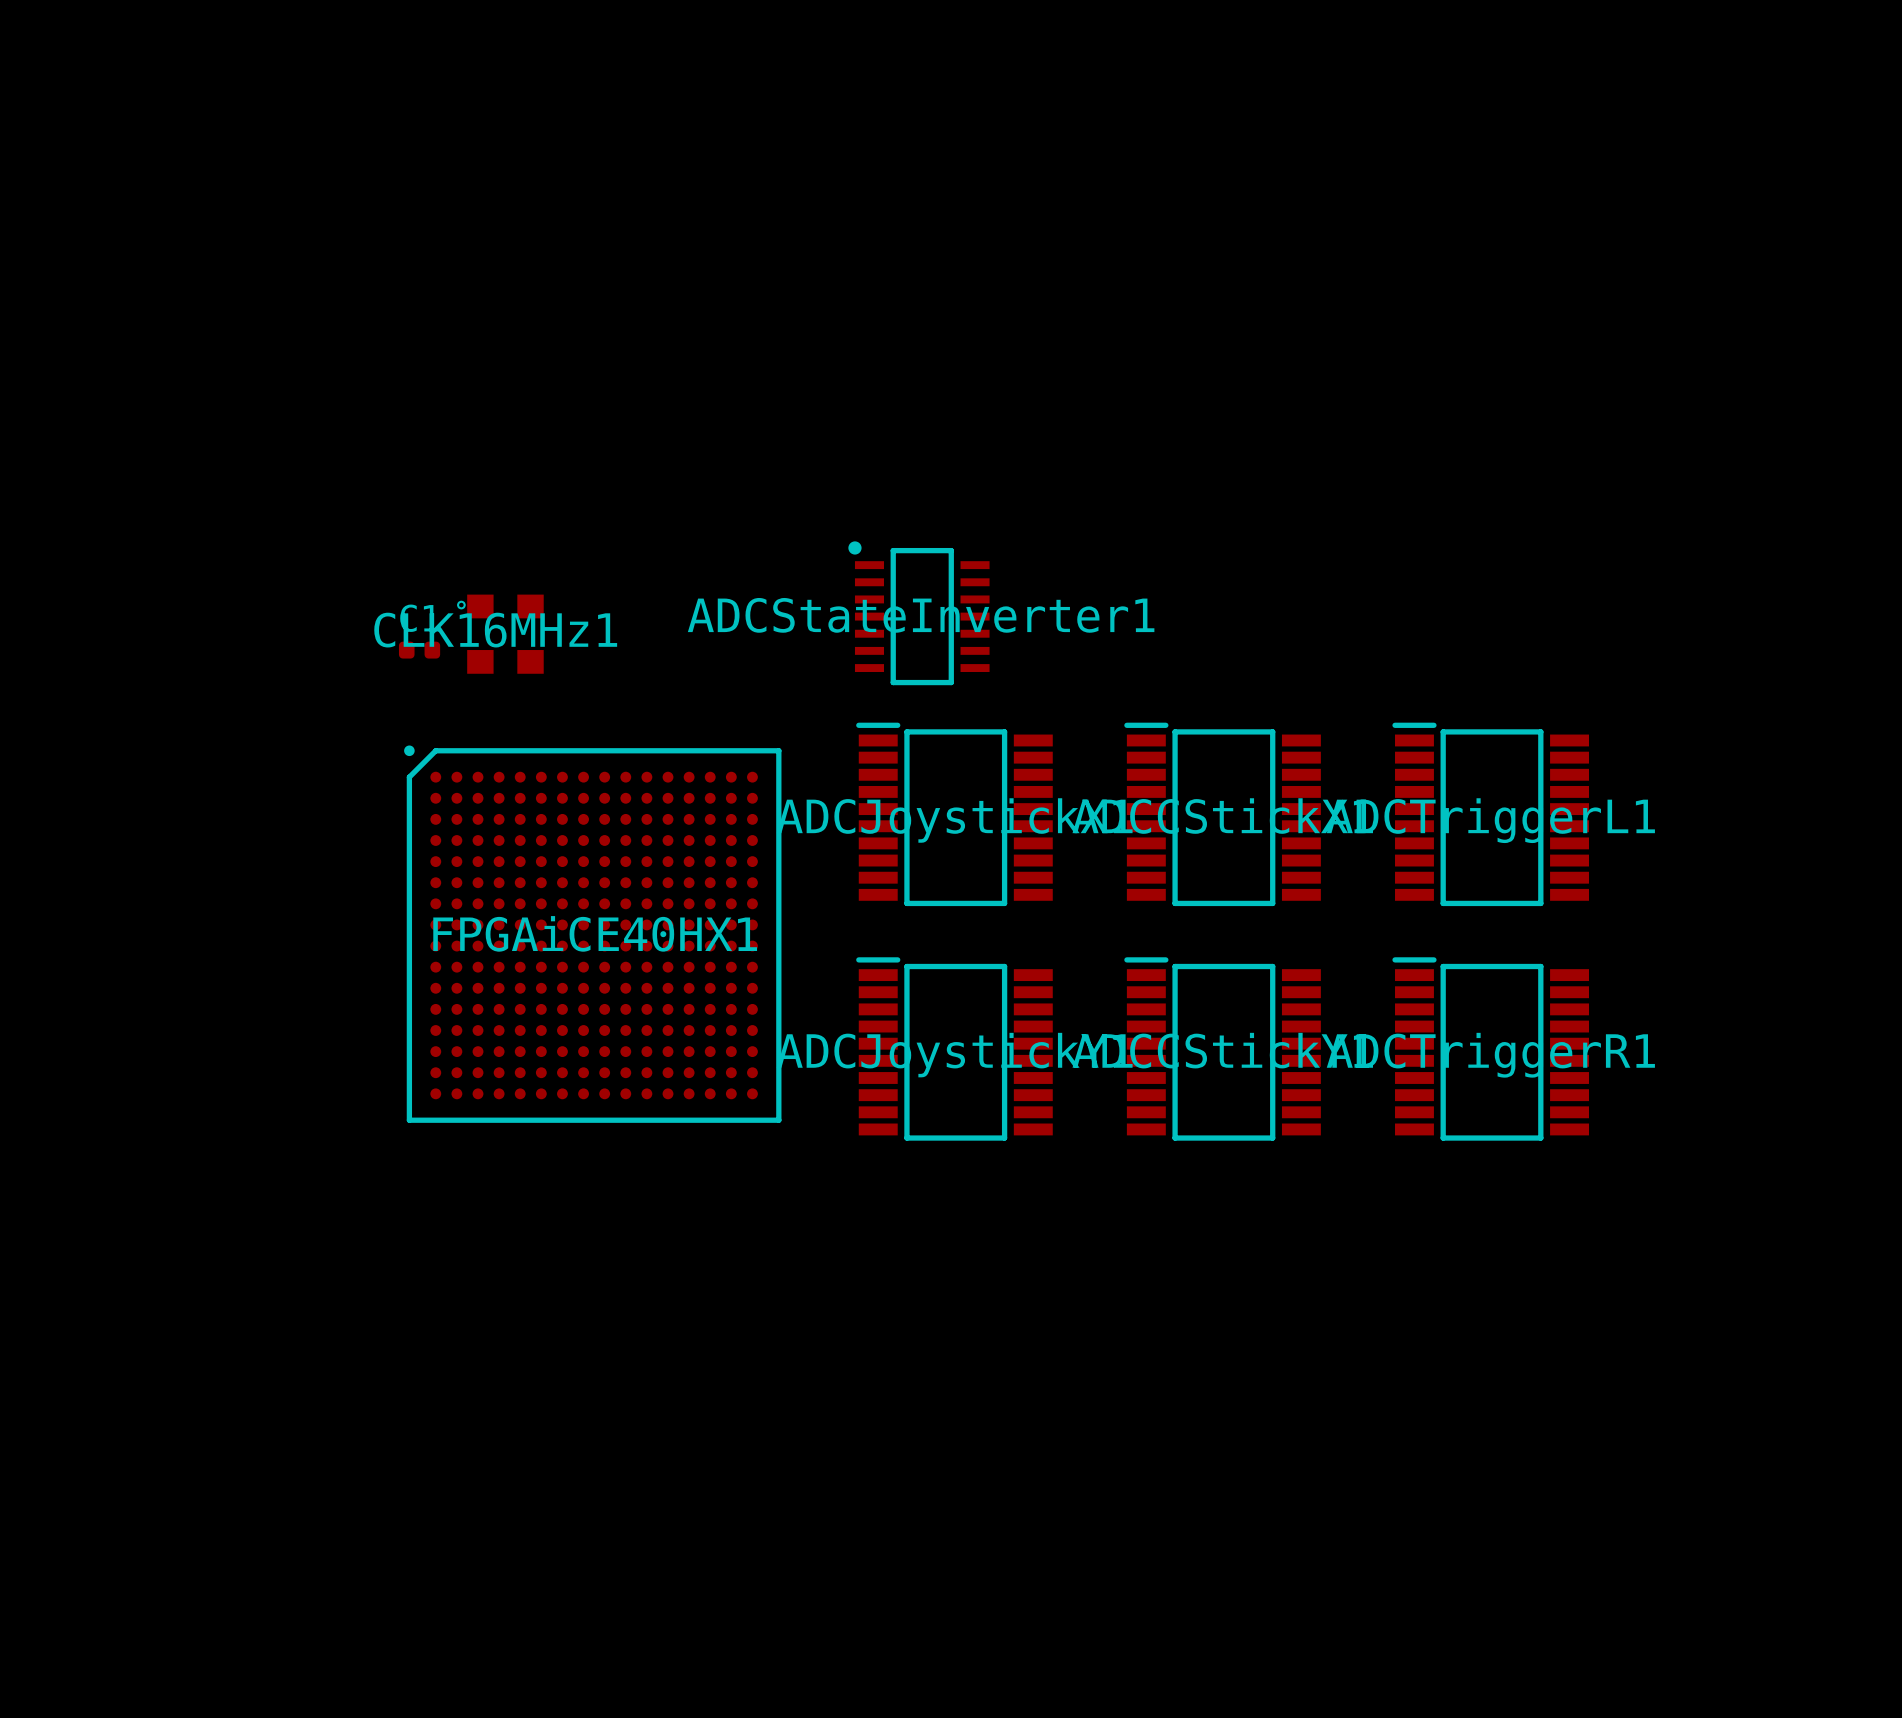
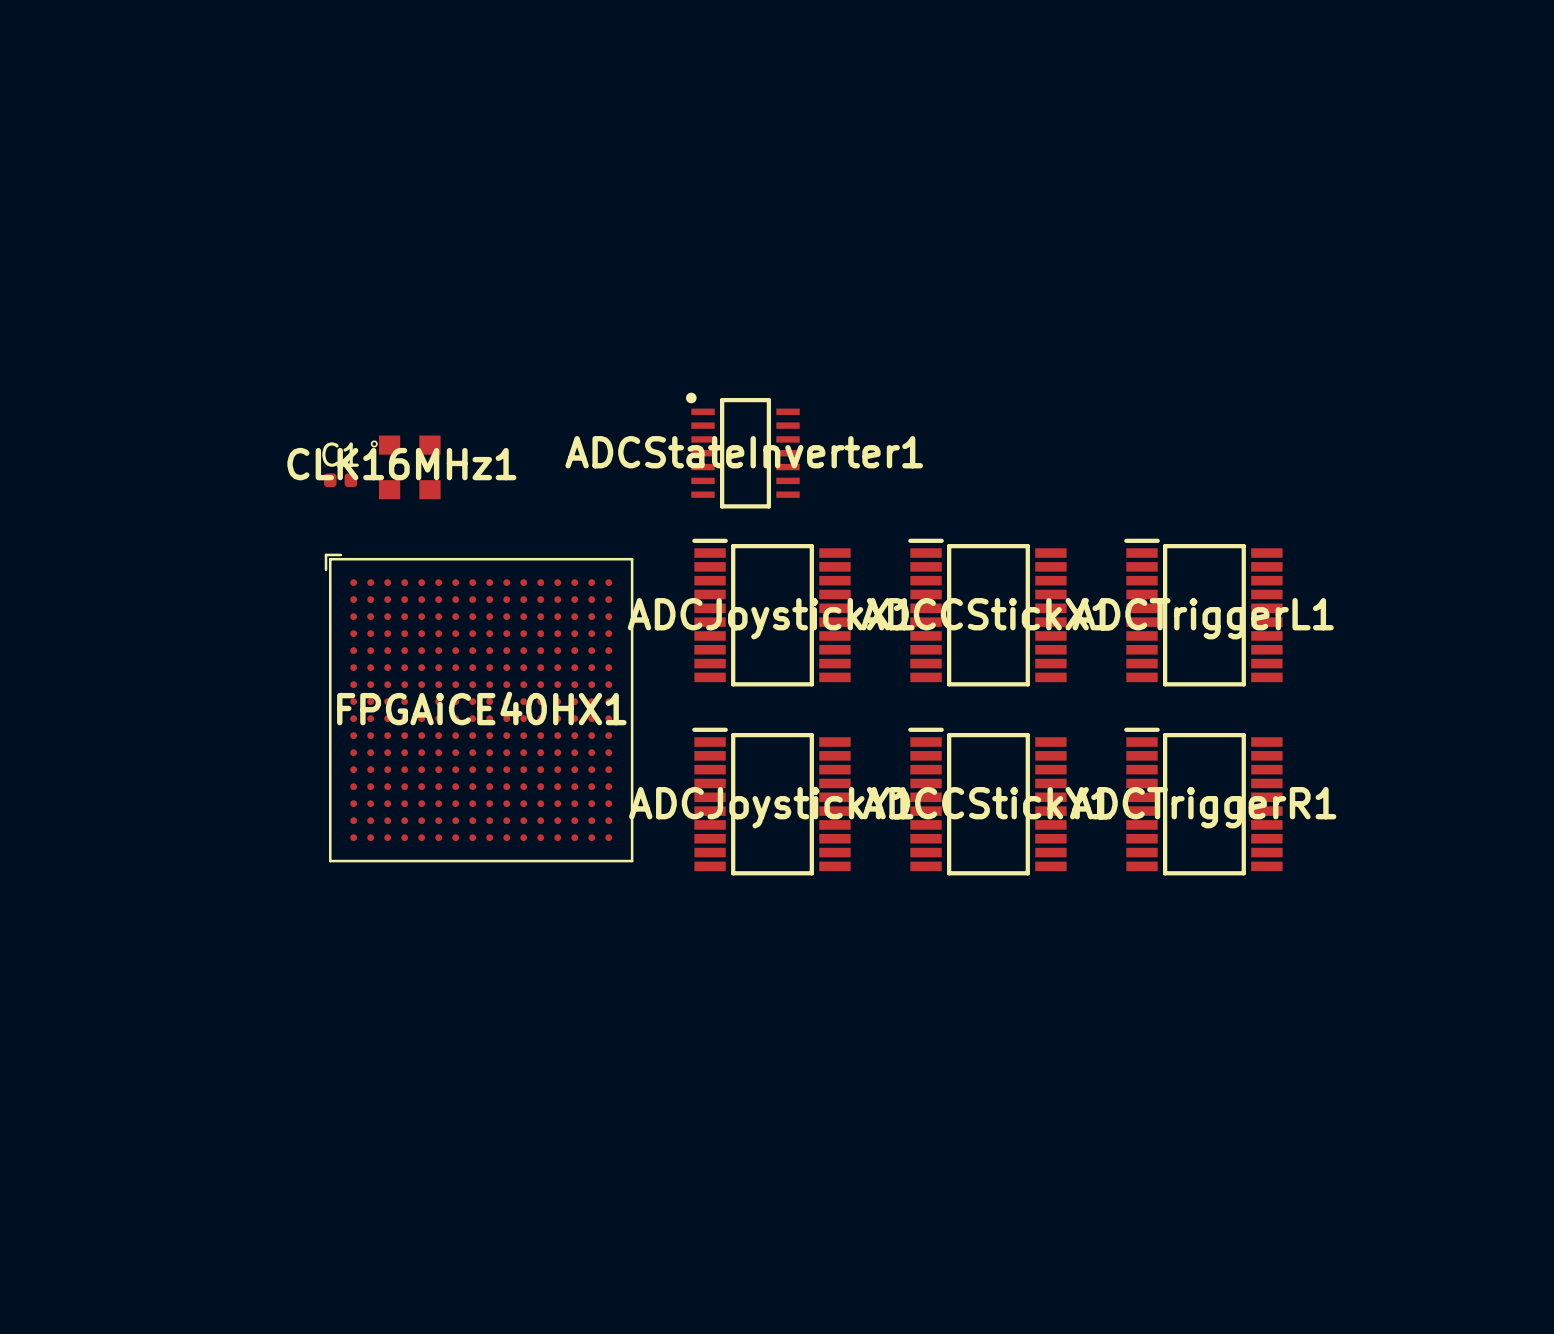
FPGAiCE40HX1 footprint: [404, 745, 782, 1123] -> [324, 553, 634, 863]

